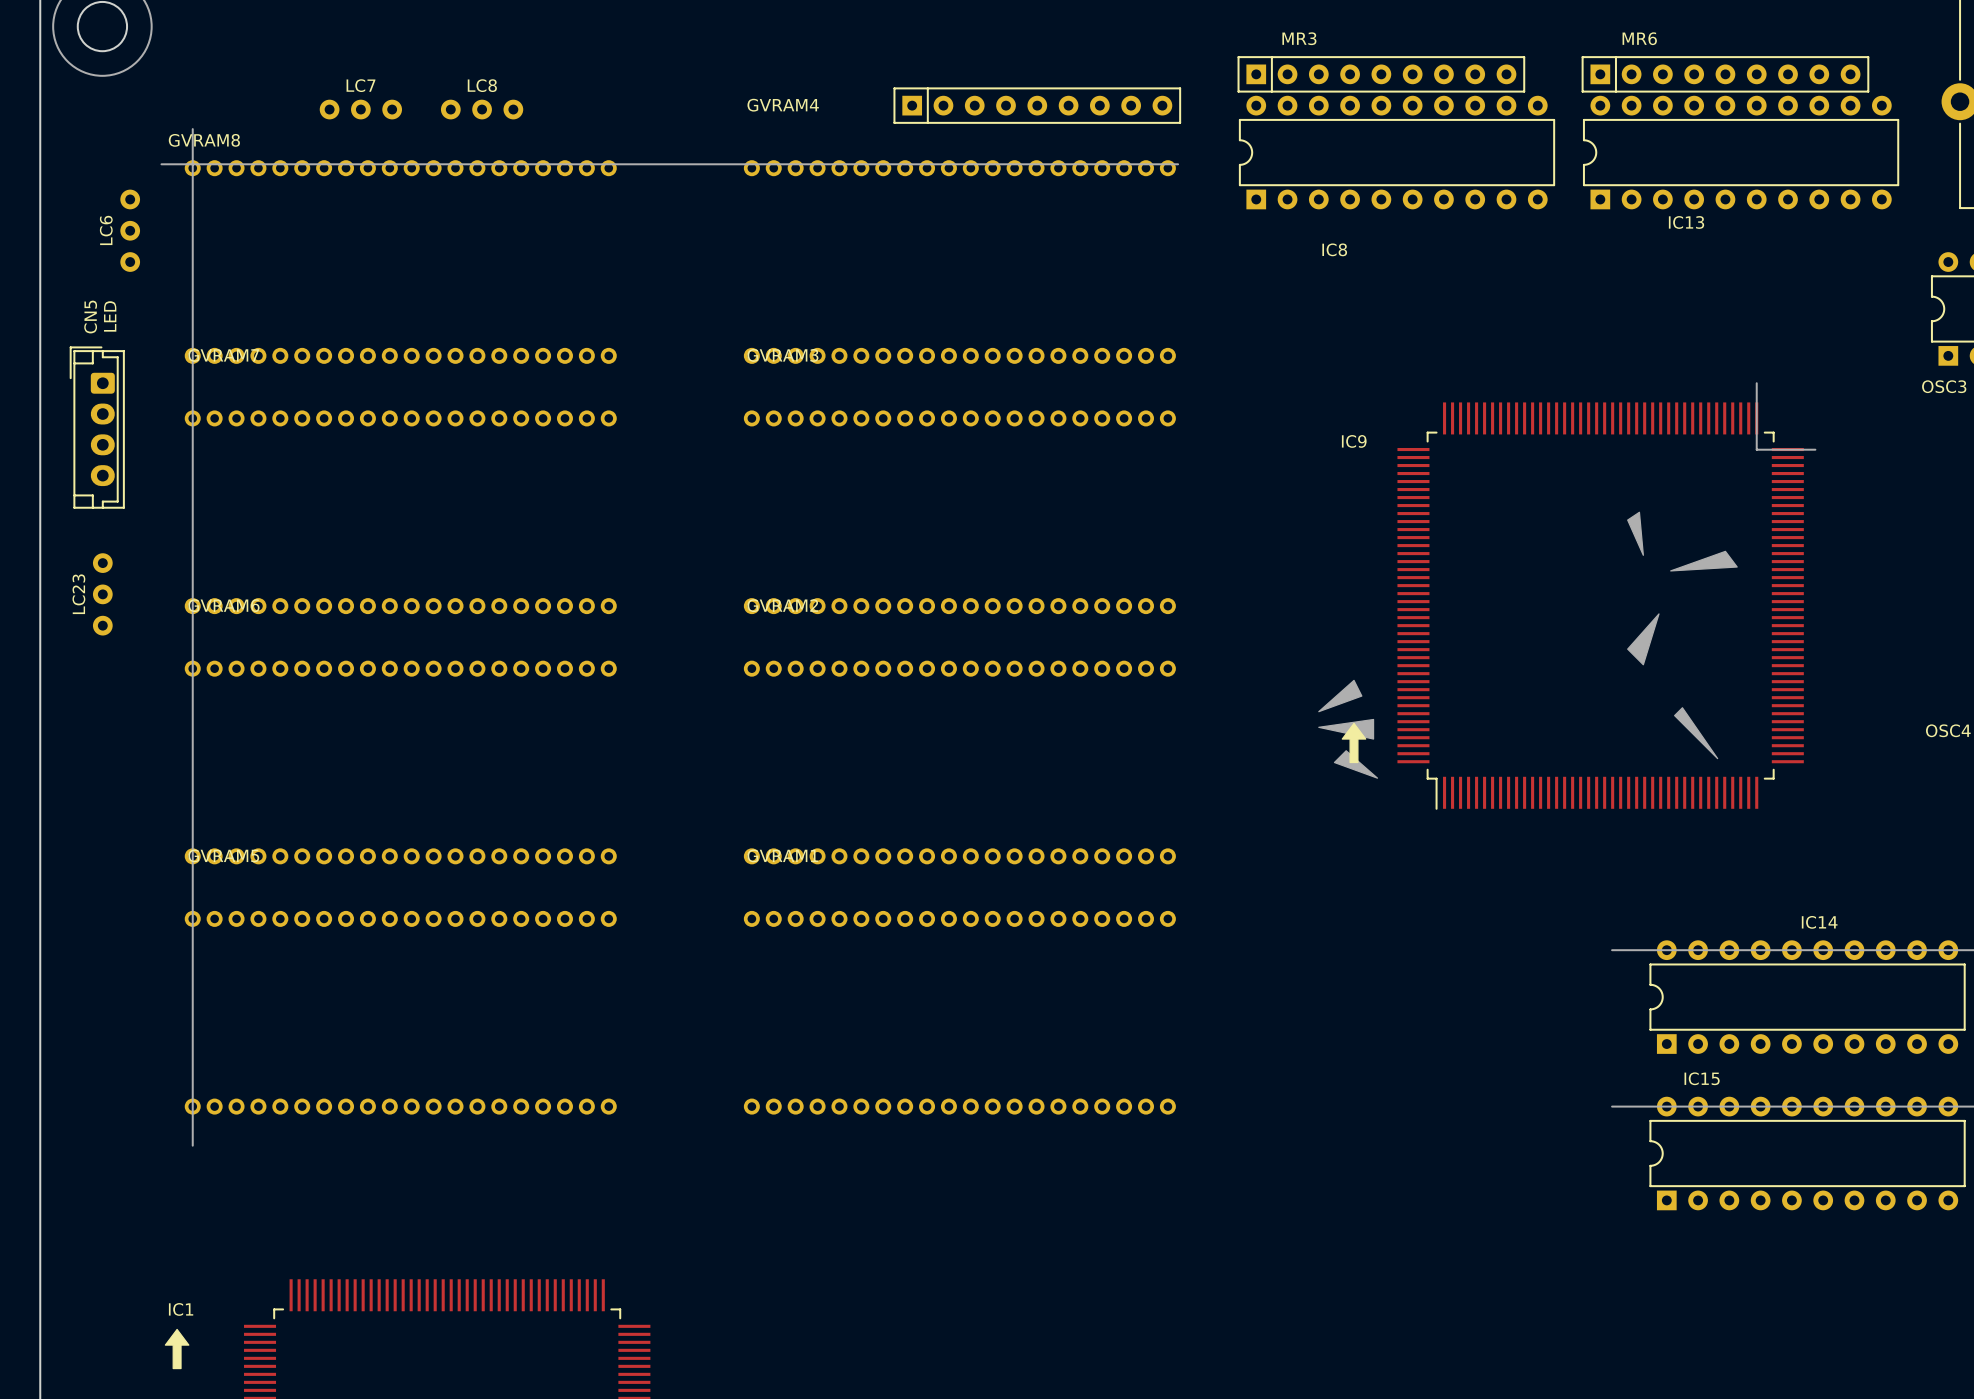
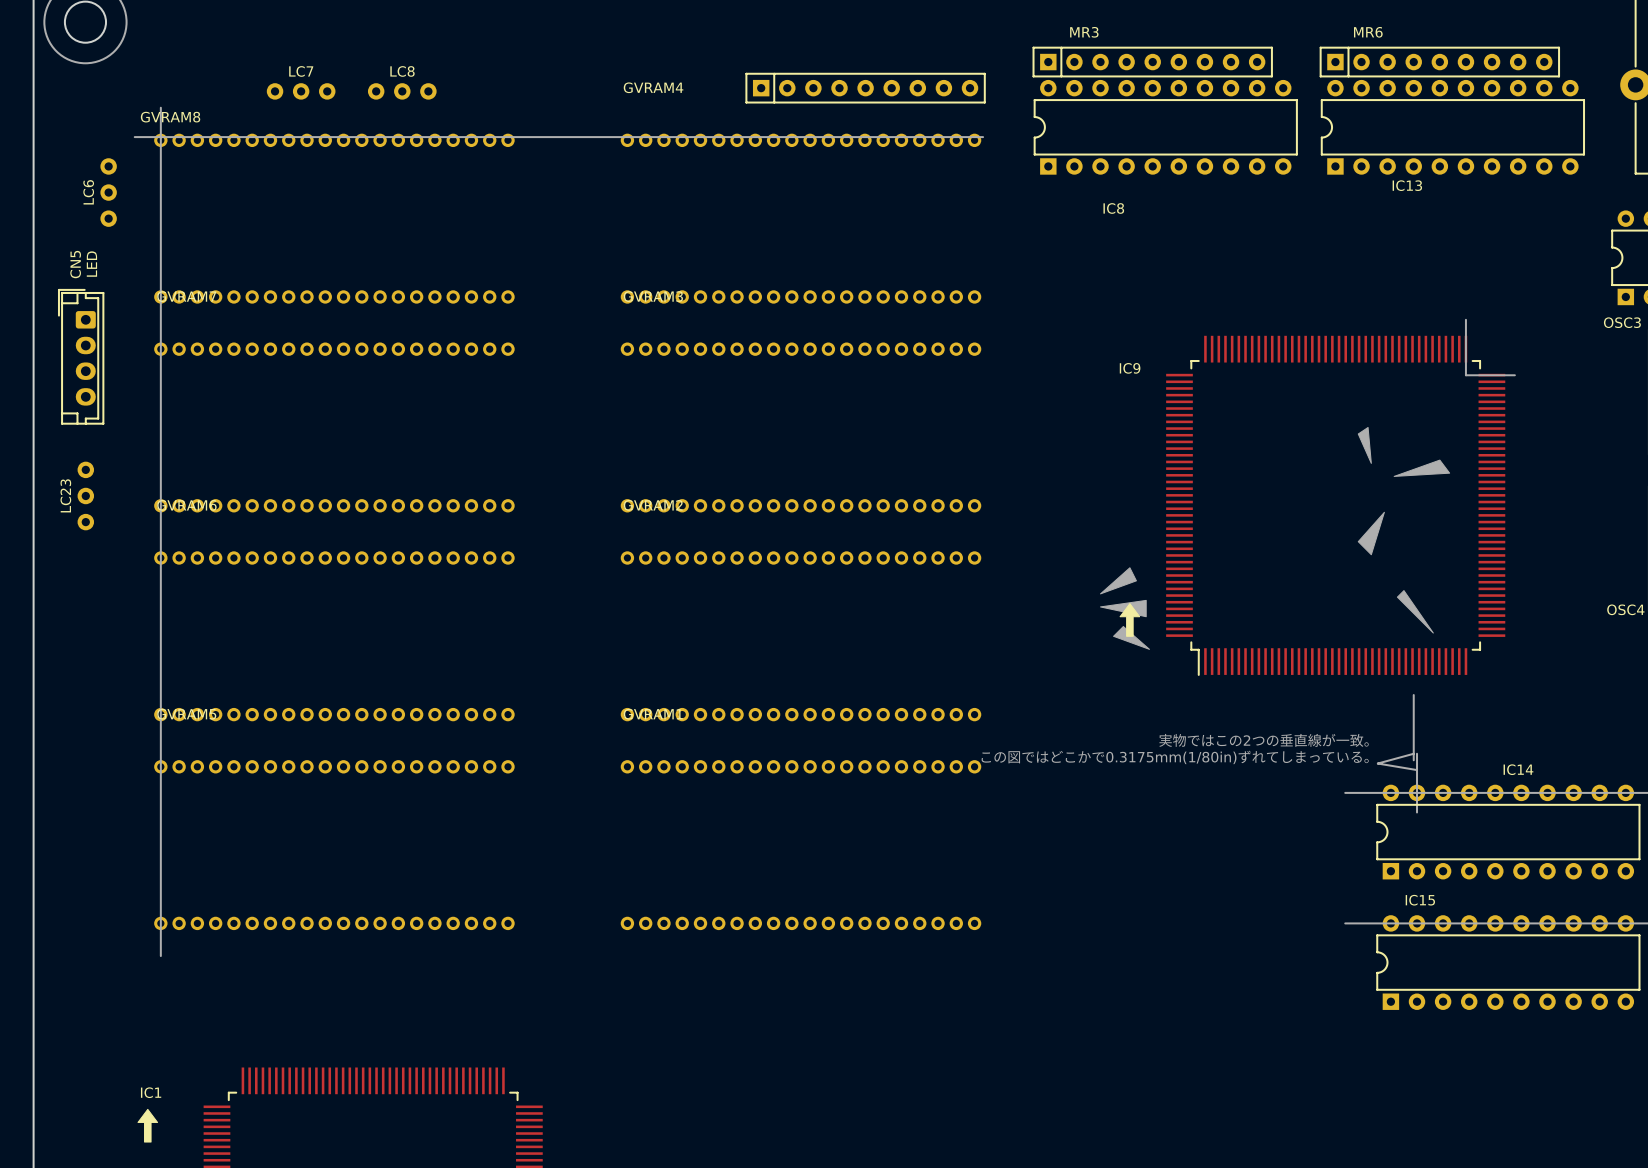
line: none -> (1413, 695) (1413, 760)
text: none -> 実物ではこの2つの垂直線が一致。 (1264, 740)
line: none -> (1413, 753) (1377, 763) (1417, 770)
line: none -> (1417, 753) (1417, 812)
text: none -> この図ではどこかで0.3175mm(1/80in)ずれてしまっている。 (1175, 757)

